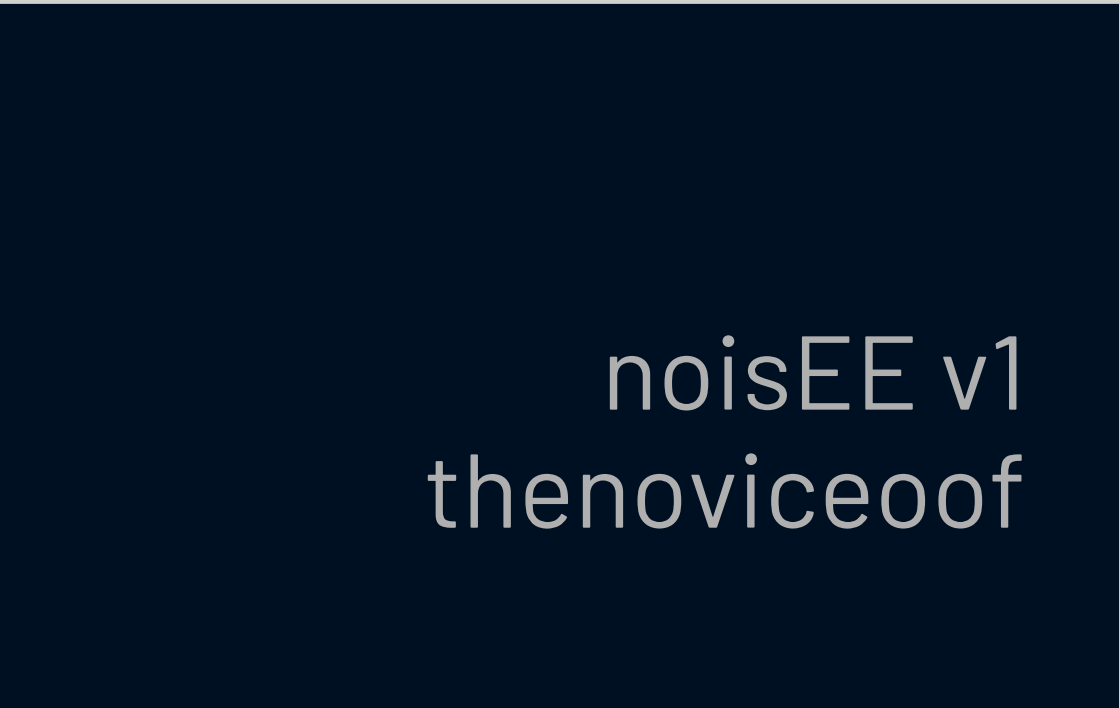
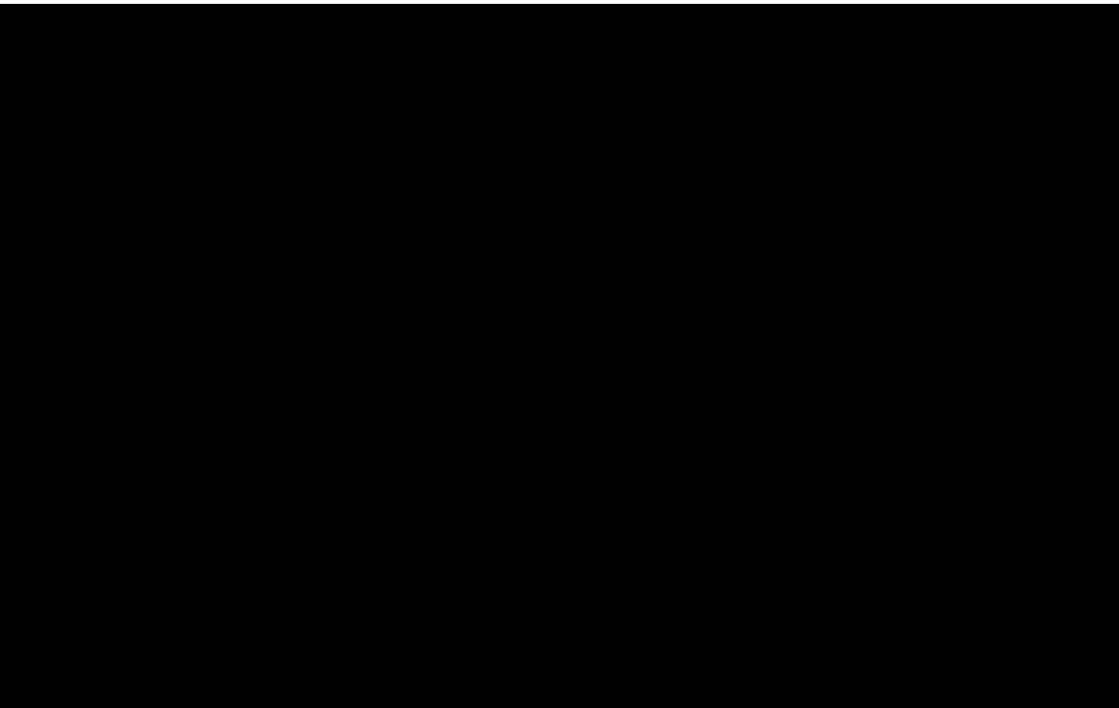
text: noisEE v1 (813, 372) -> none
text: thenoviceoof (724, 491) -> none

